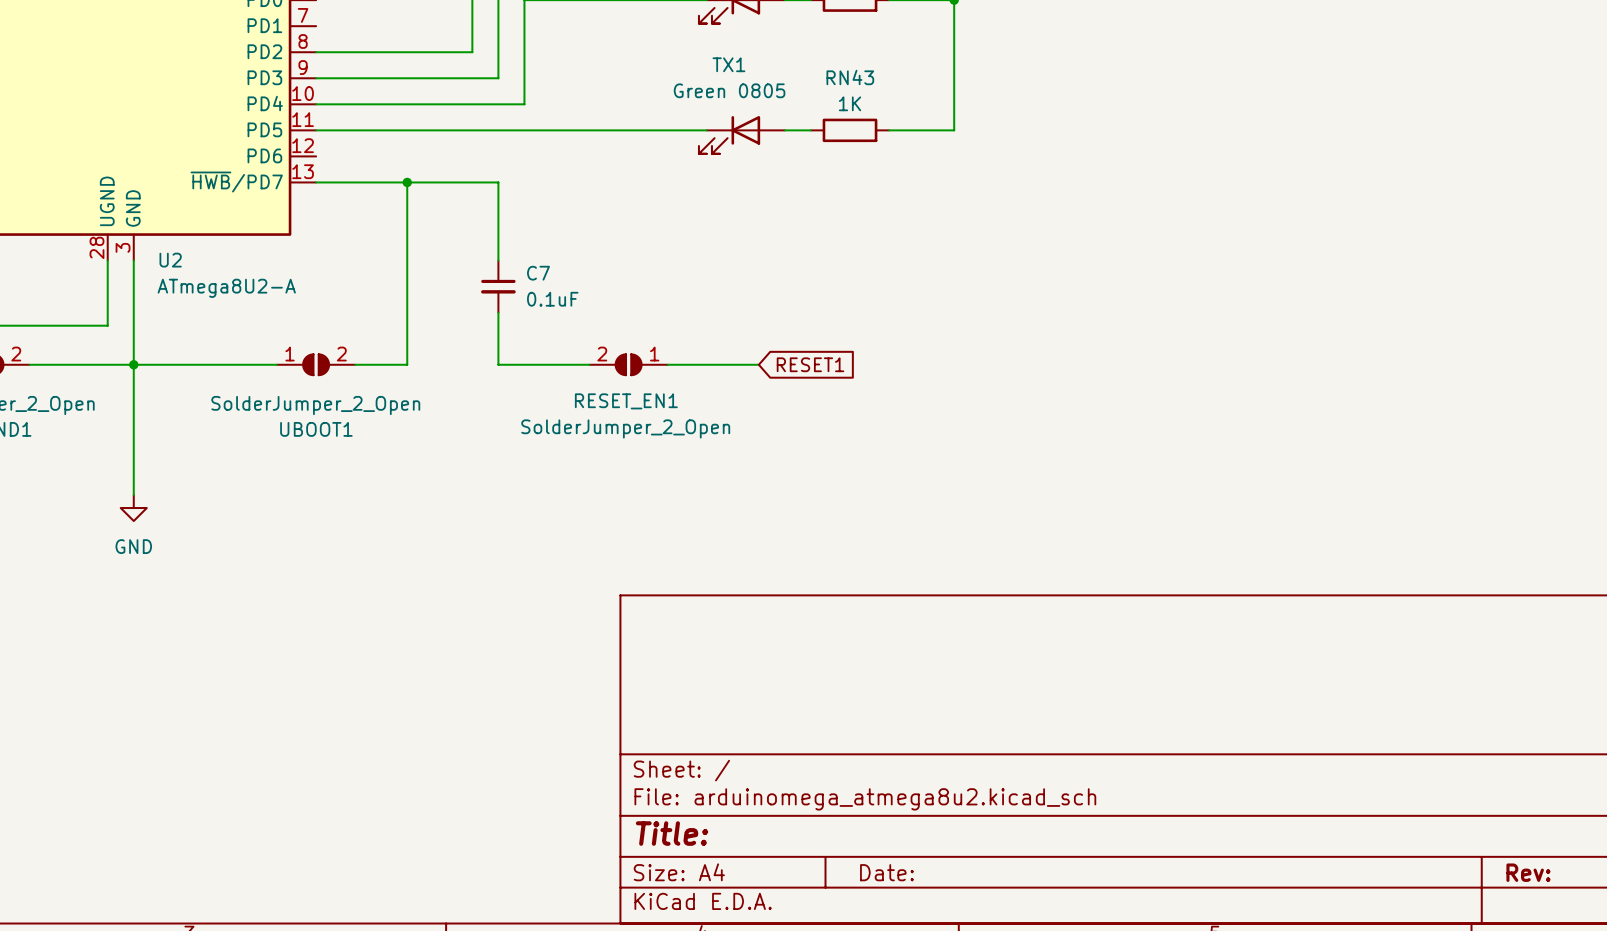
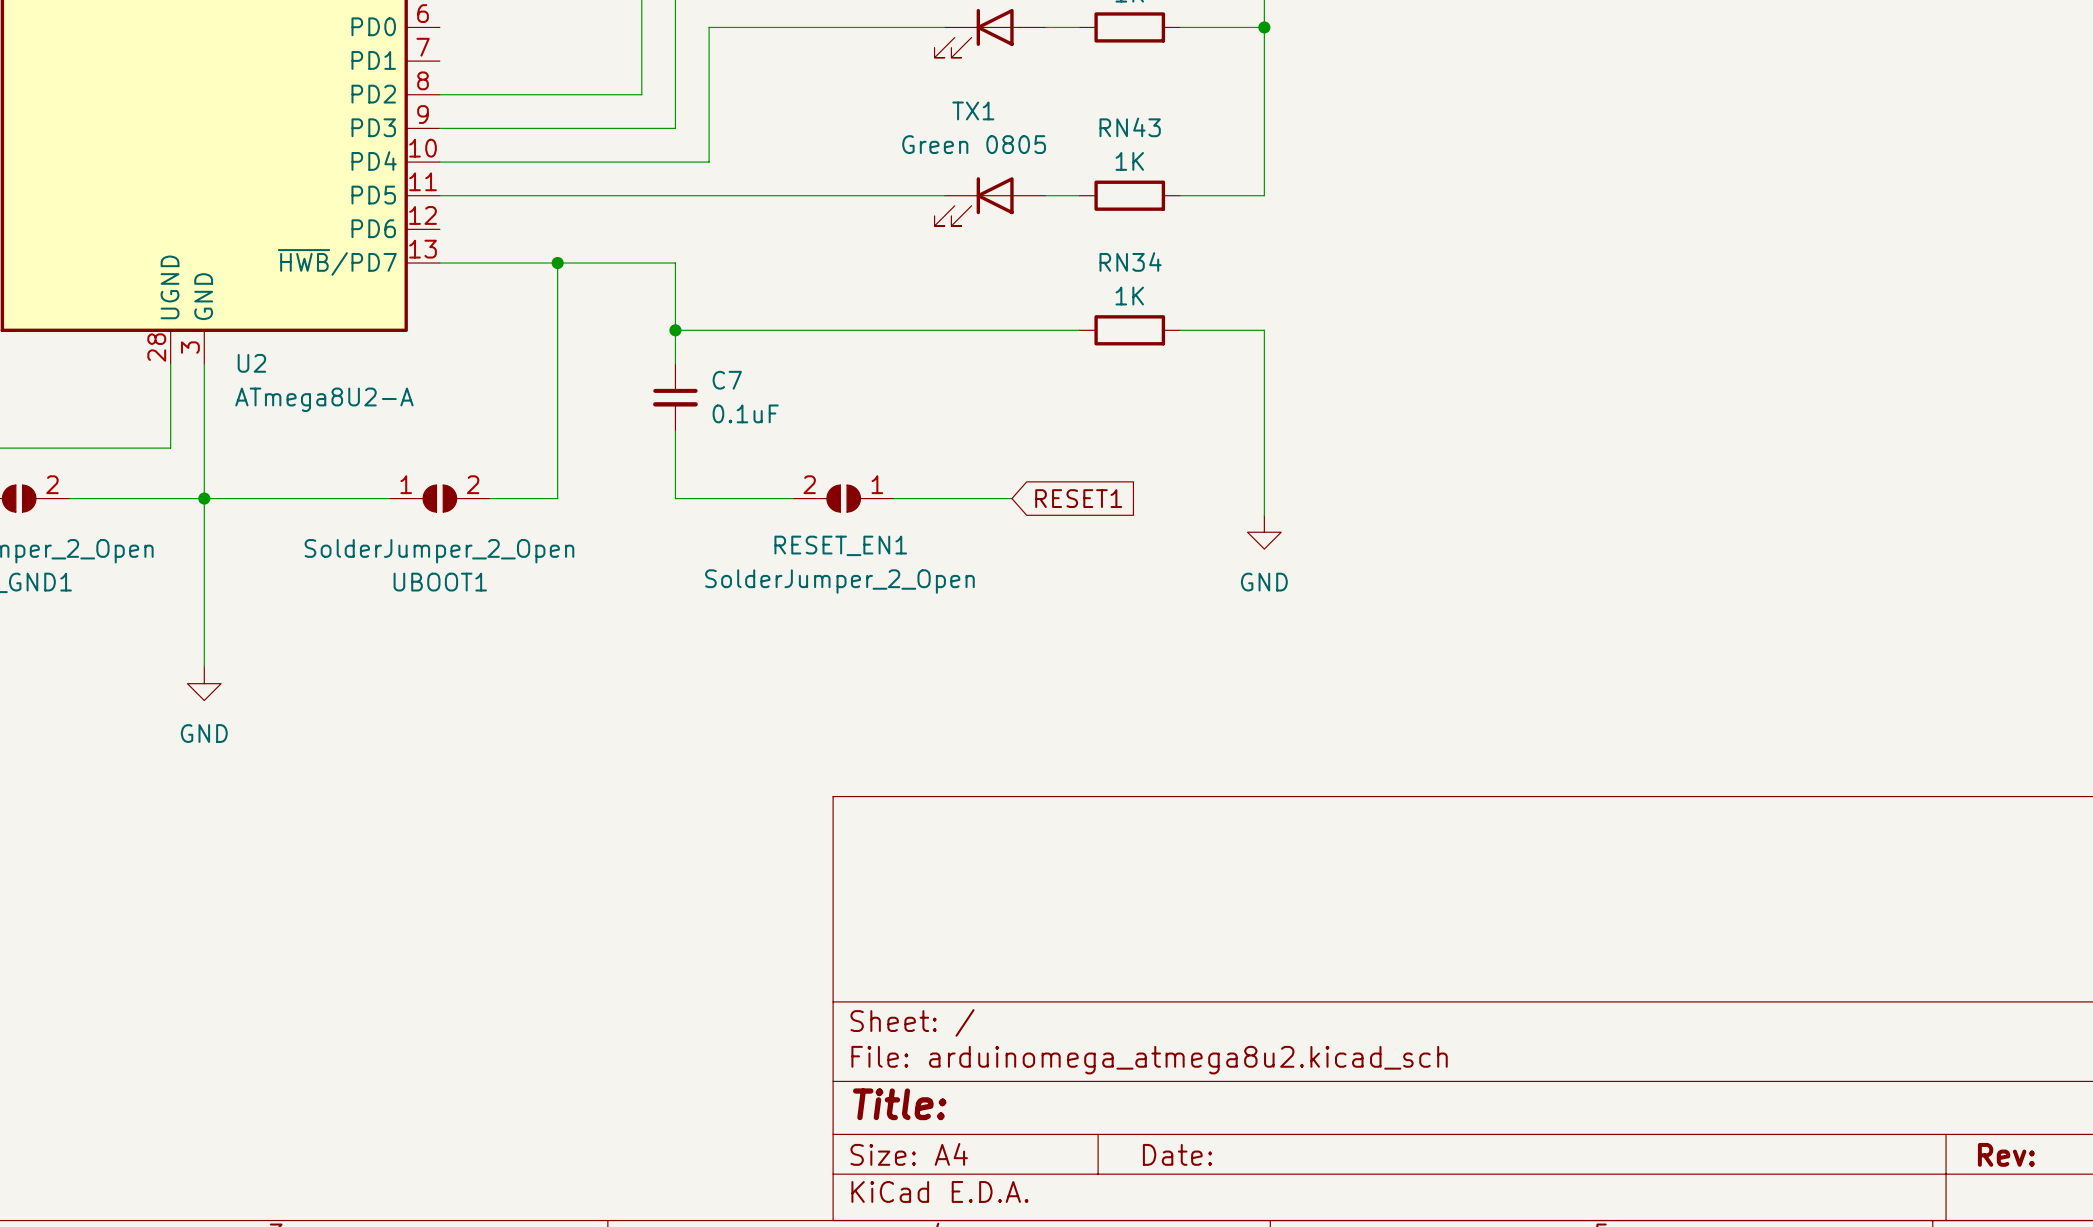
wire: none -> (675, 330) (1079, 330)
junction: none -> (675, 330)
RN34: none -> (1129, 330)
wire: none -> (1180, 330) (1264, 330) (1264, 515)
power symbol: none -> GND (1264, 532)

